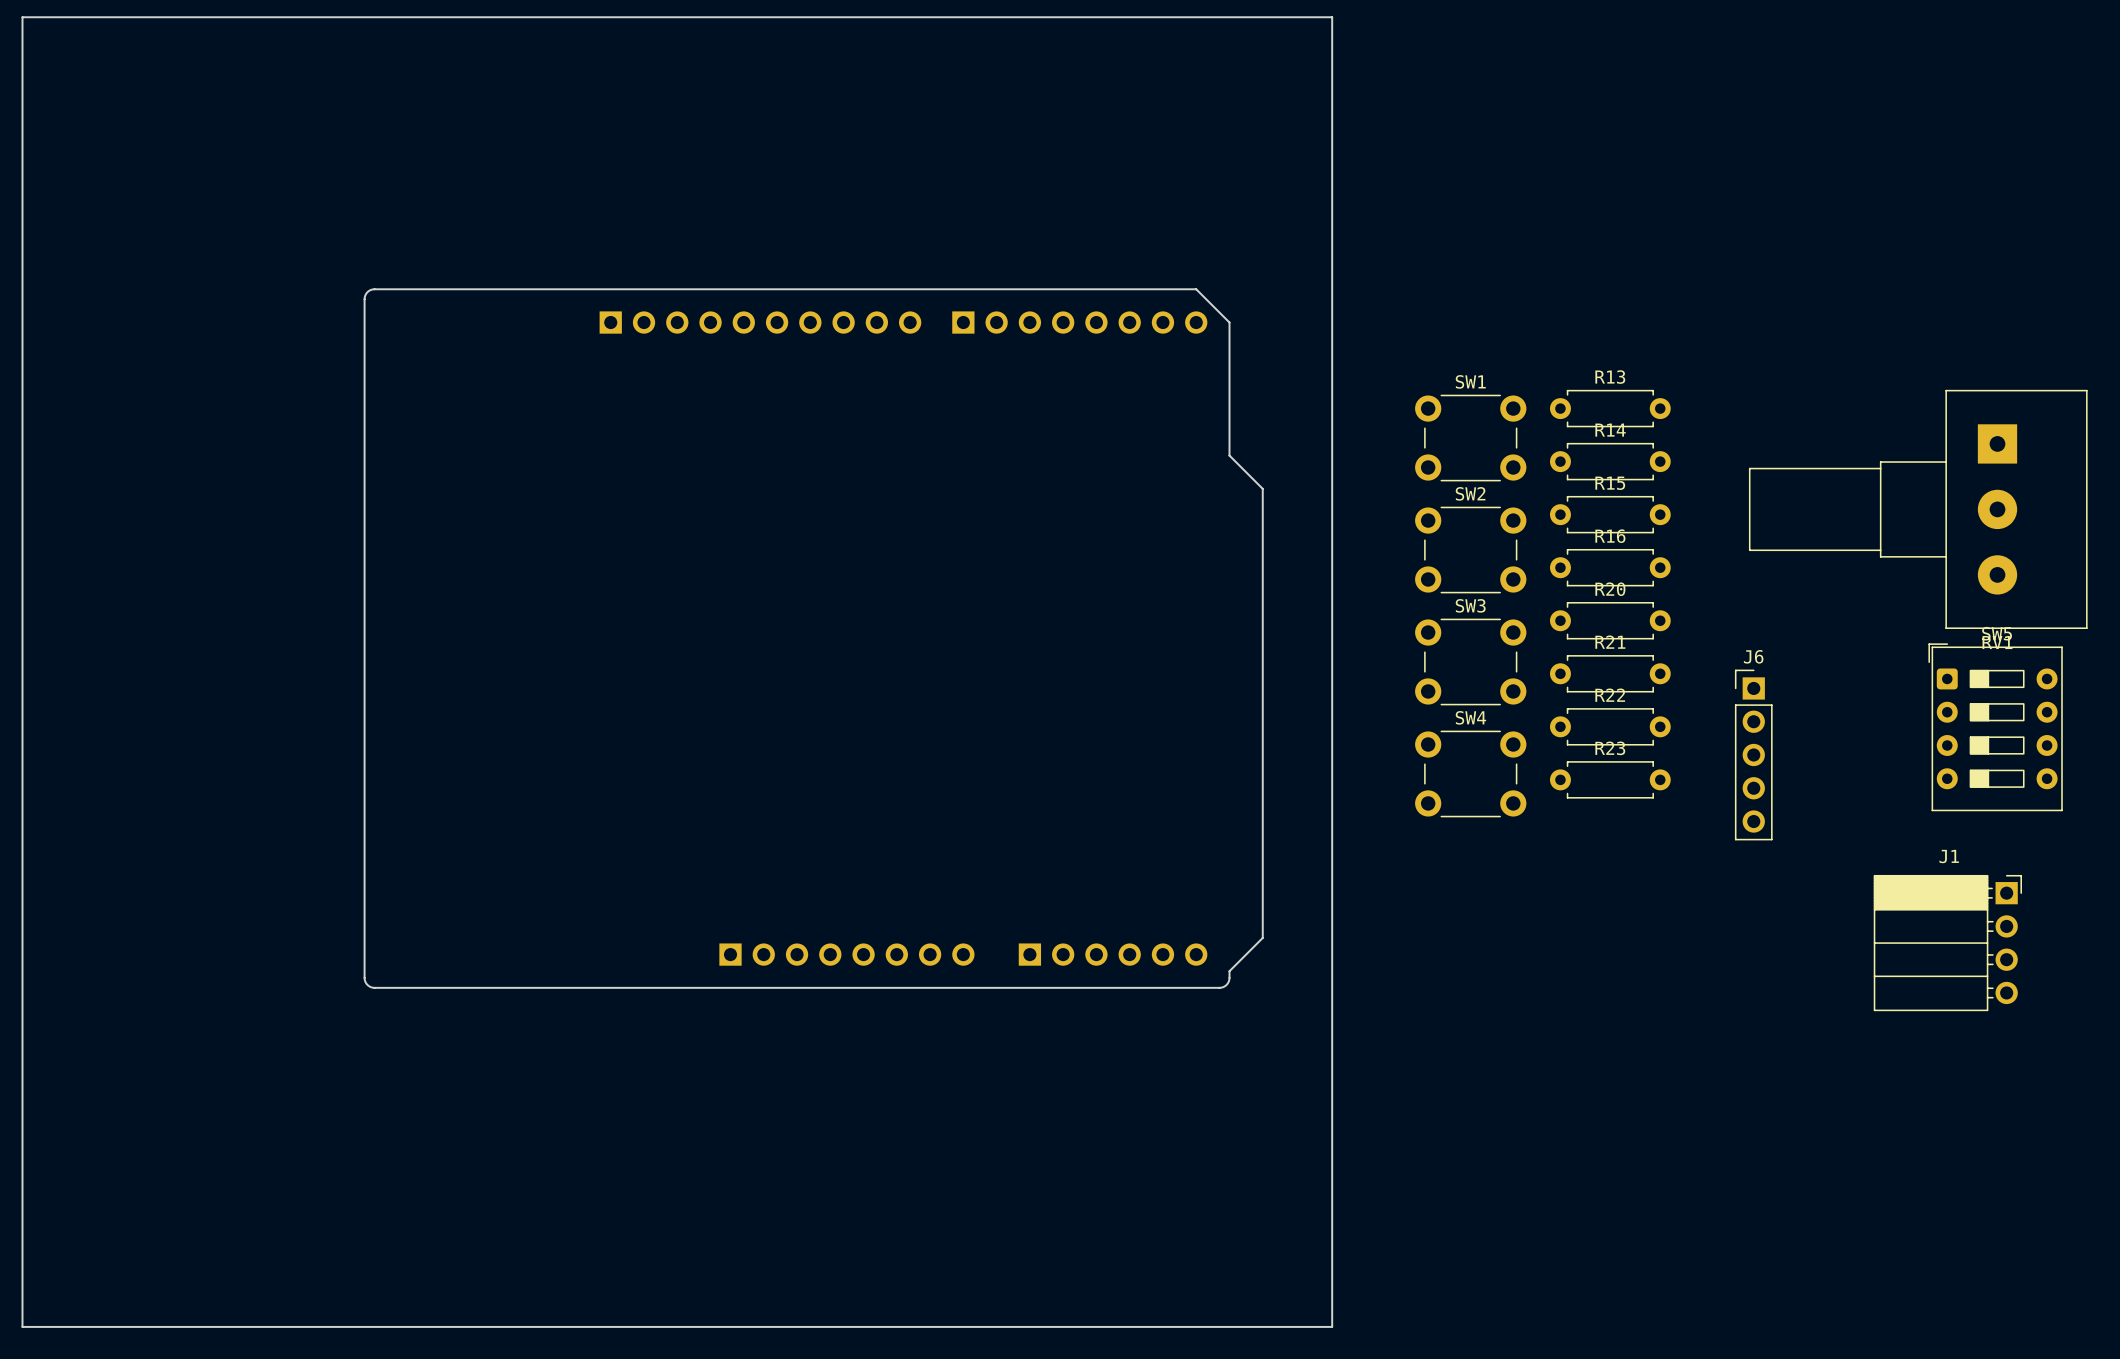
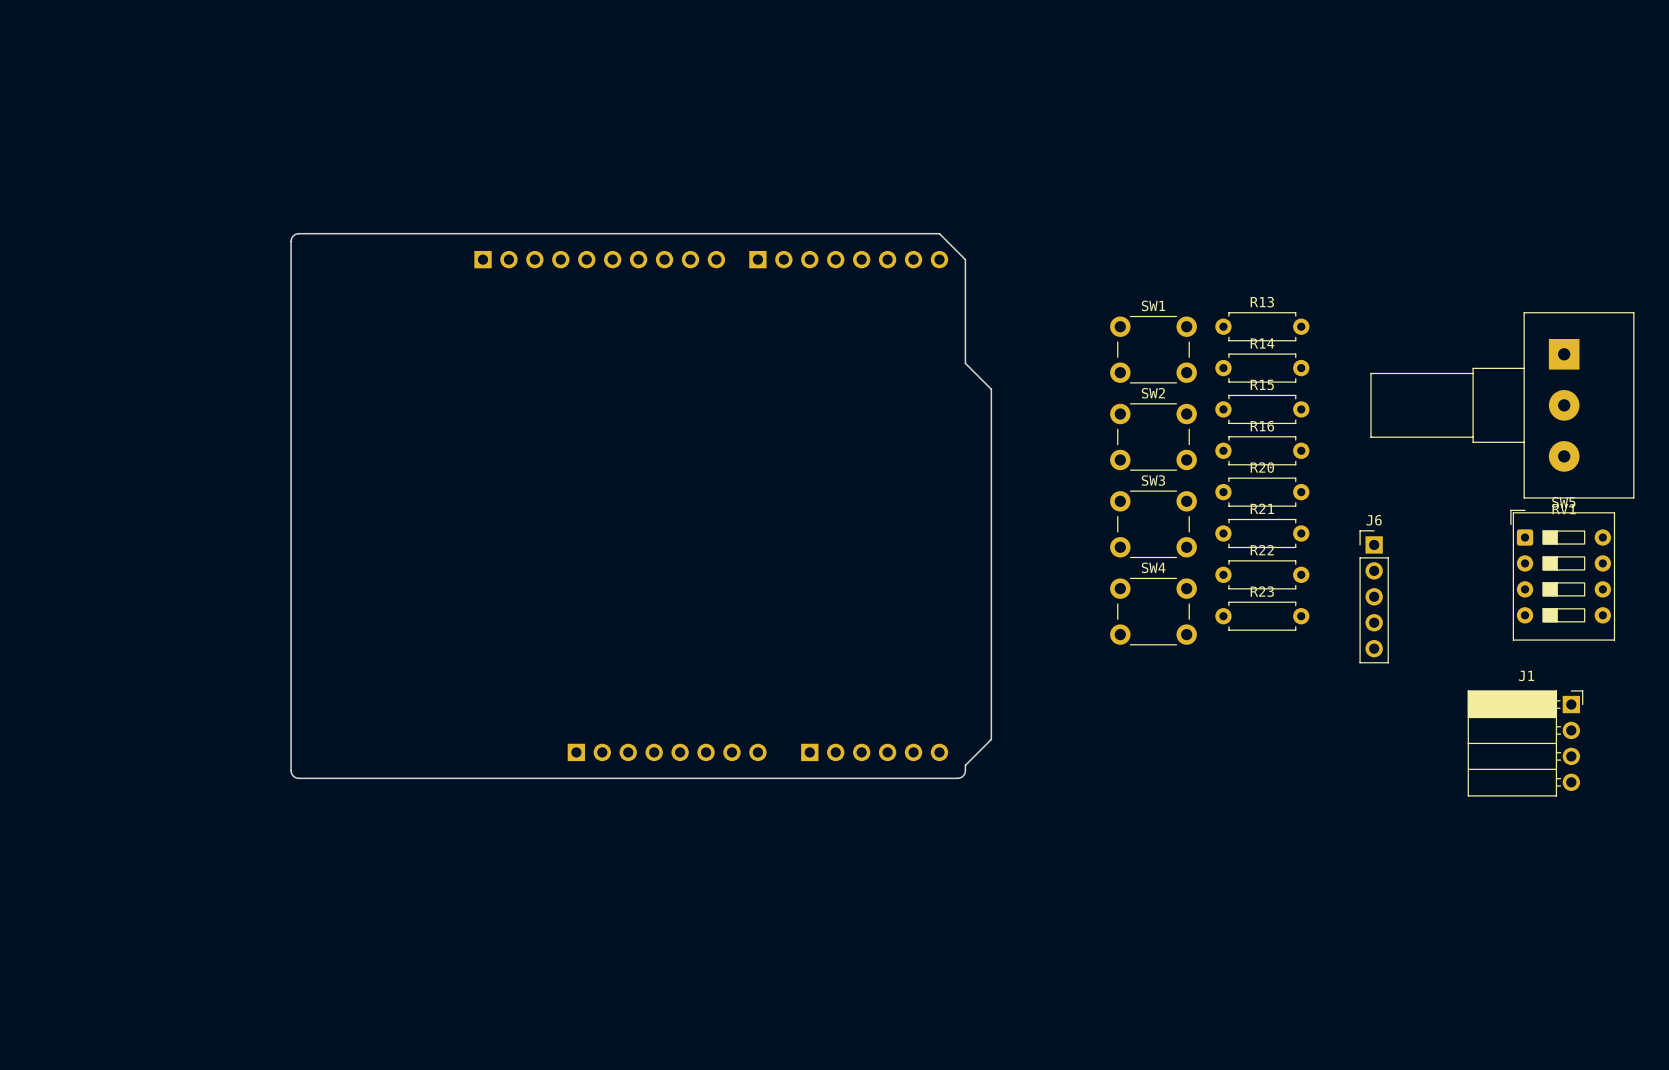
board edge: (22, 17) (1332, 17) (1332, 1326) (22, 1326) (22, 17) -> none

